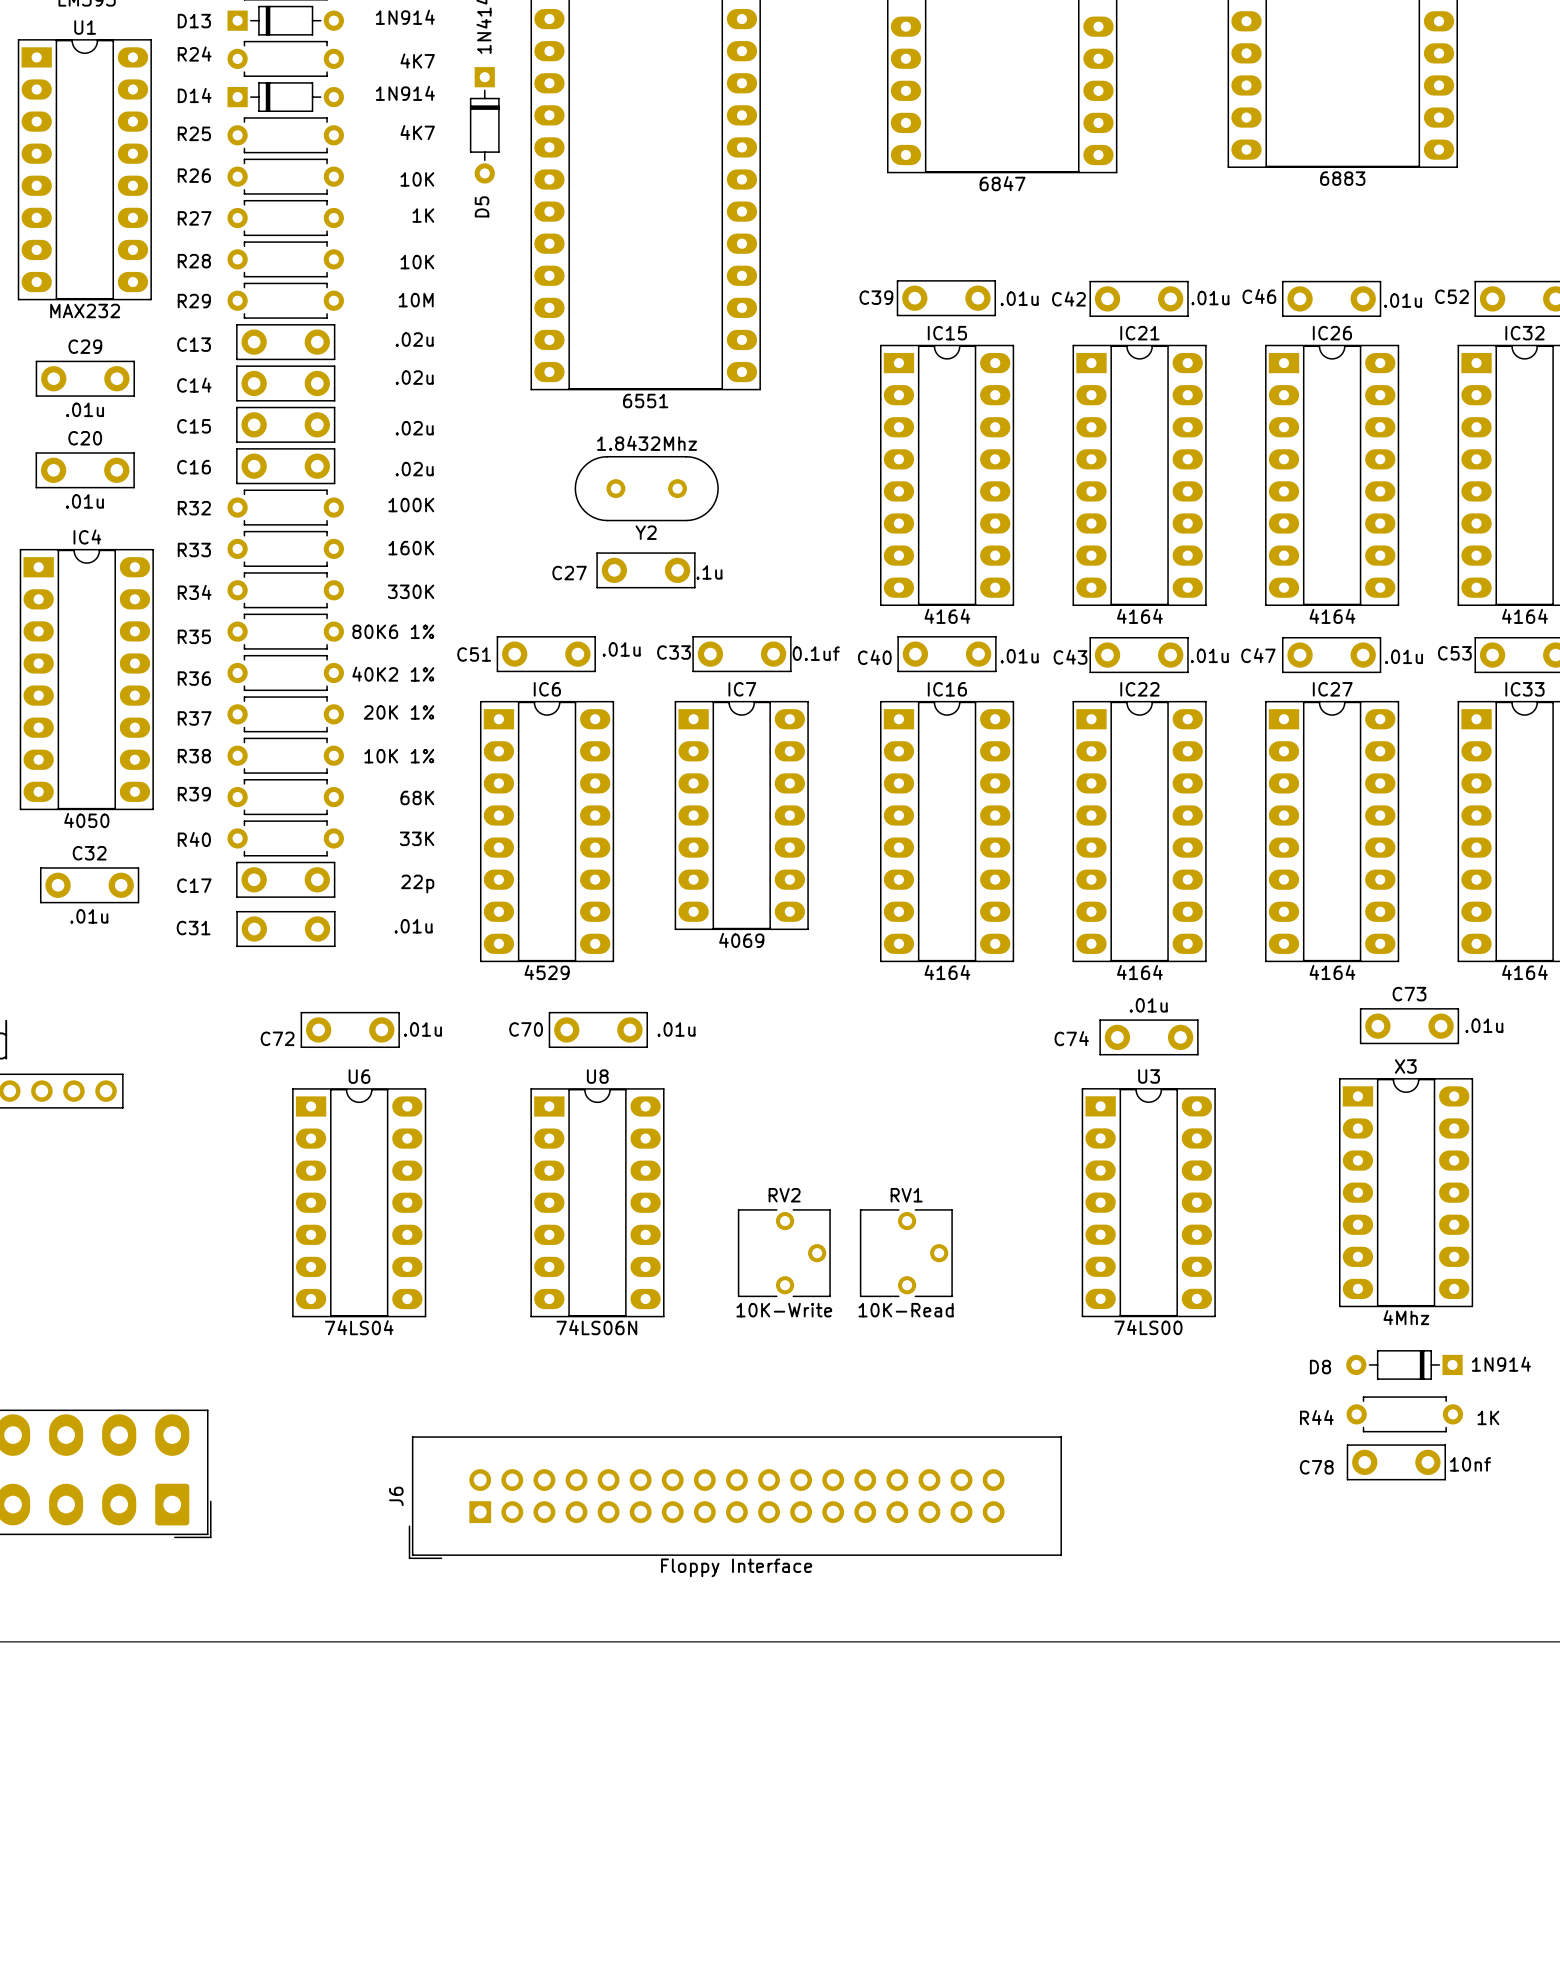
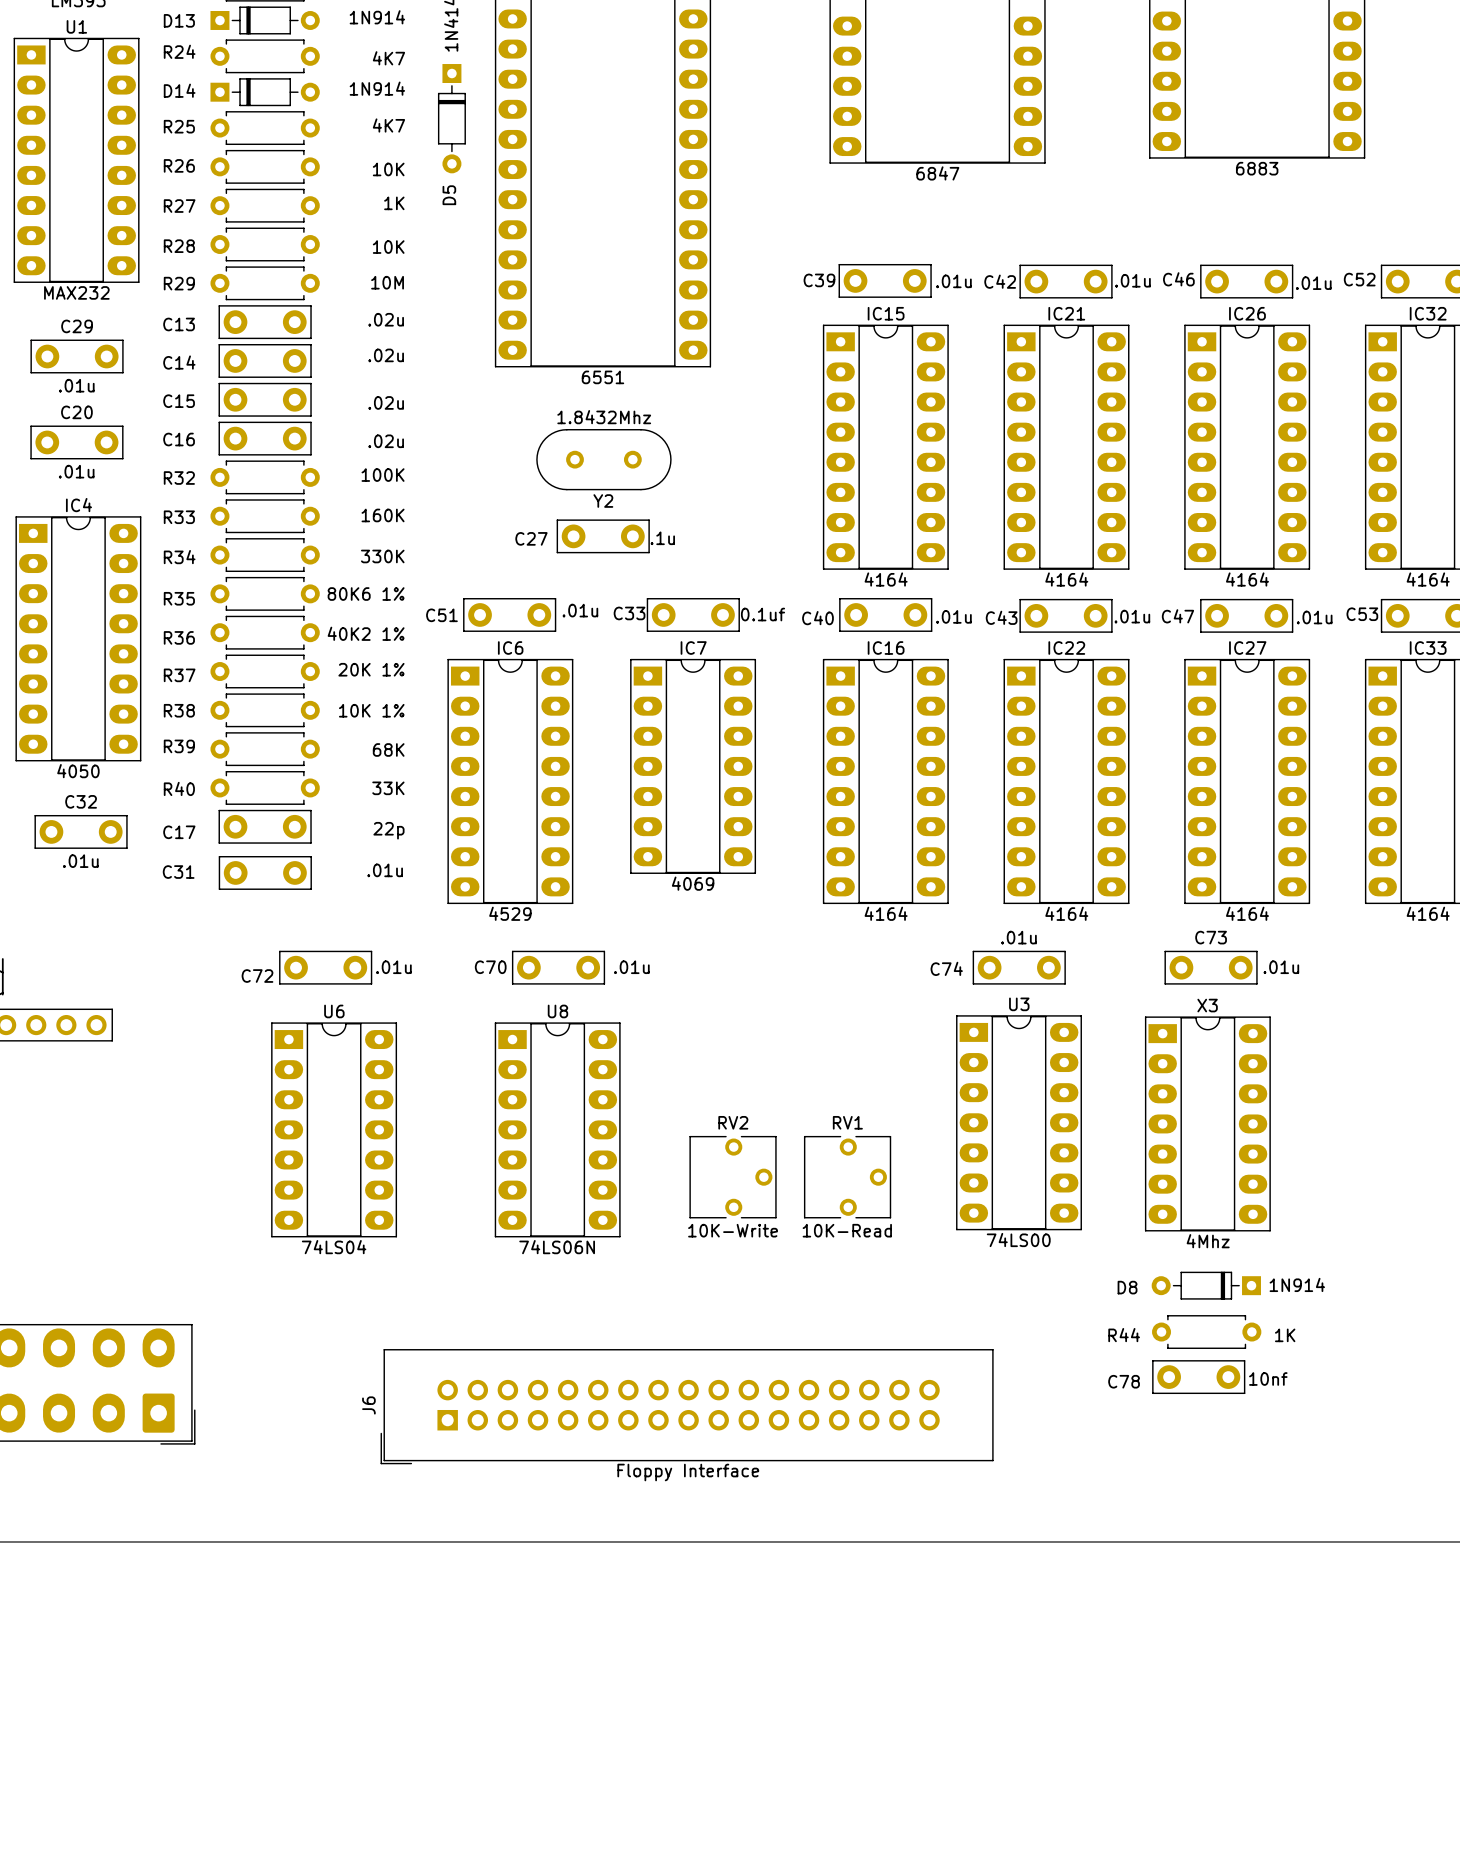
C73 position: (1409, 1026) -> (1211, 967)
C74 position: (1149, 1037) -> (1019, 967)
X3 position: (1406, 1192) -> (1207, 1123)
U3 position: (1148, 1202) -> (1019, 1122)
D8 position: (1404, 1364) -> (1206, 1285)
R44 position: (1404, 1414) -> (1206, 1332)
C78 position: (1396, 1462) -> (1198, 1377)

